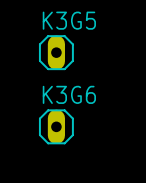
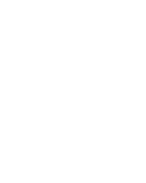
K3G5: (56, 52) -> none
K3G6: (56, 126) -> none

